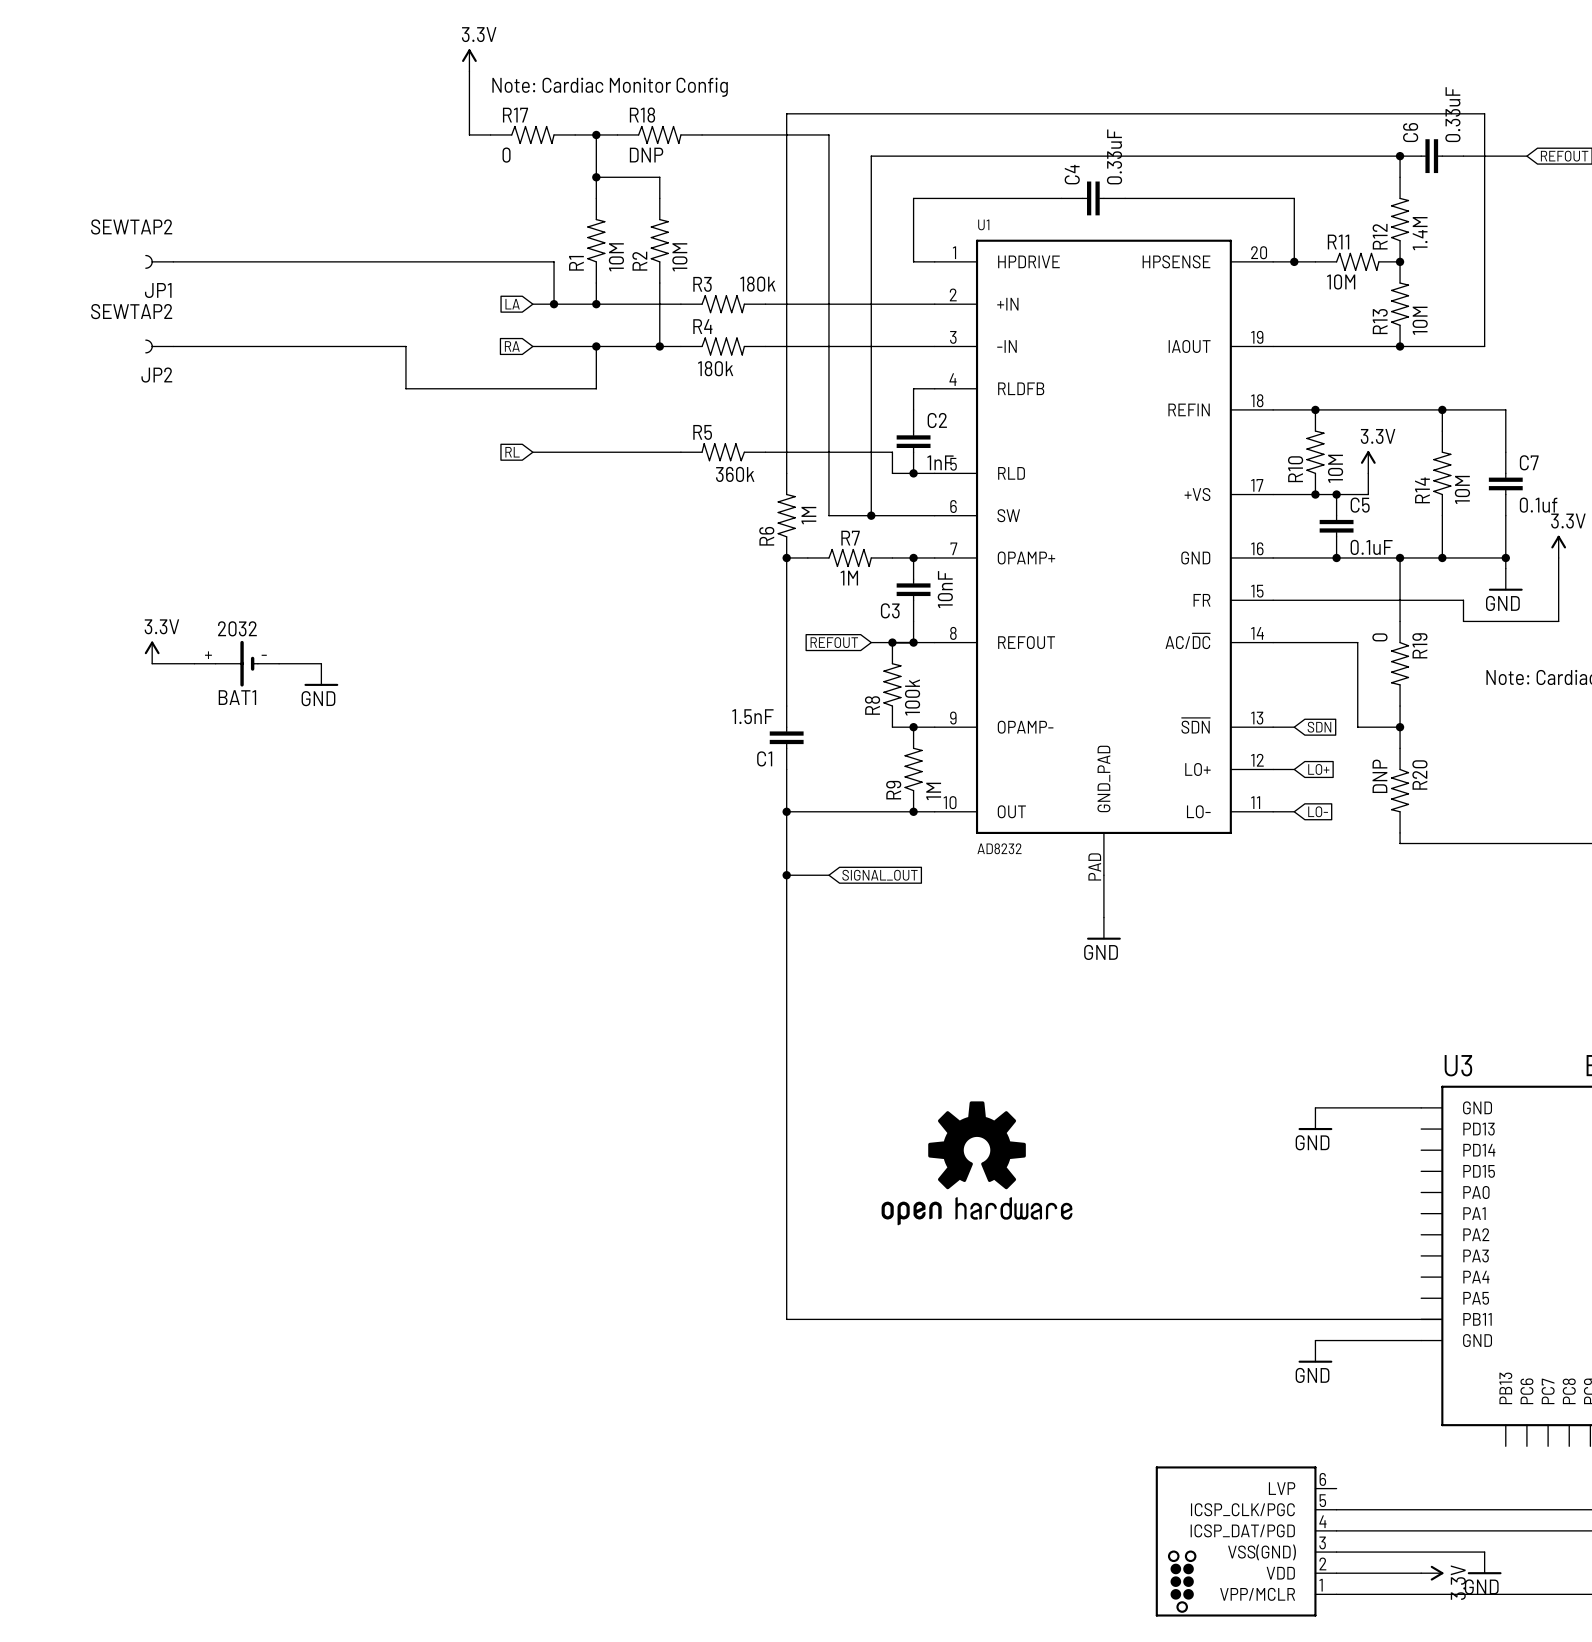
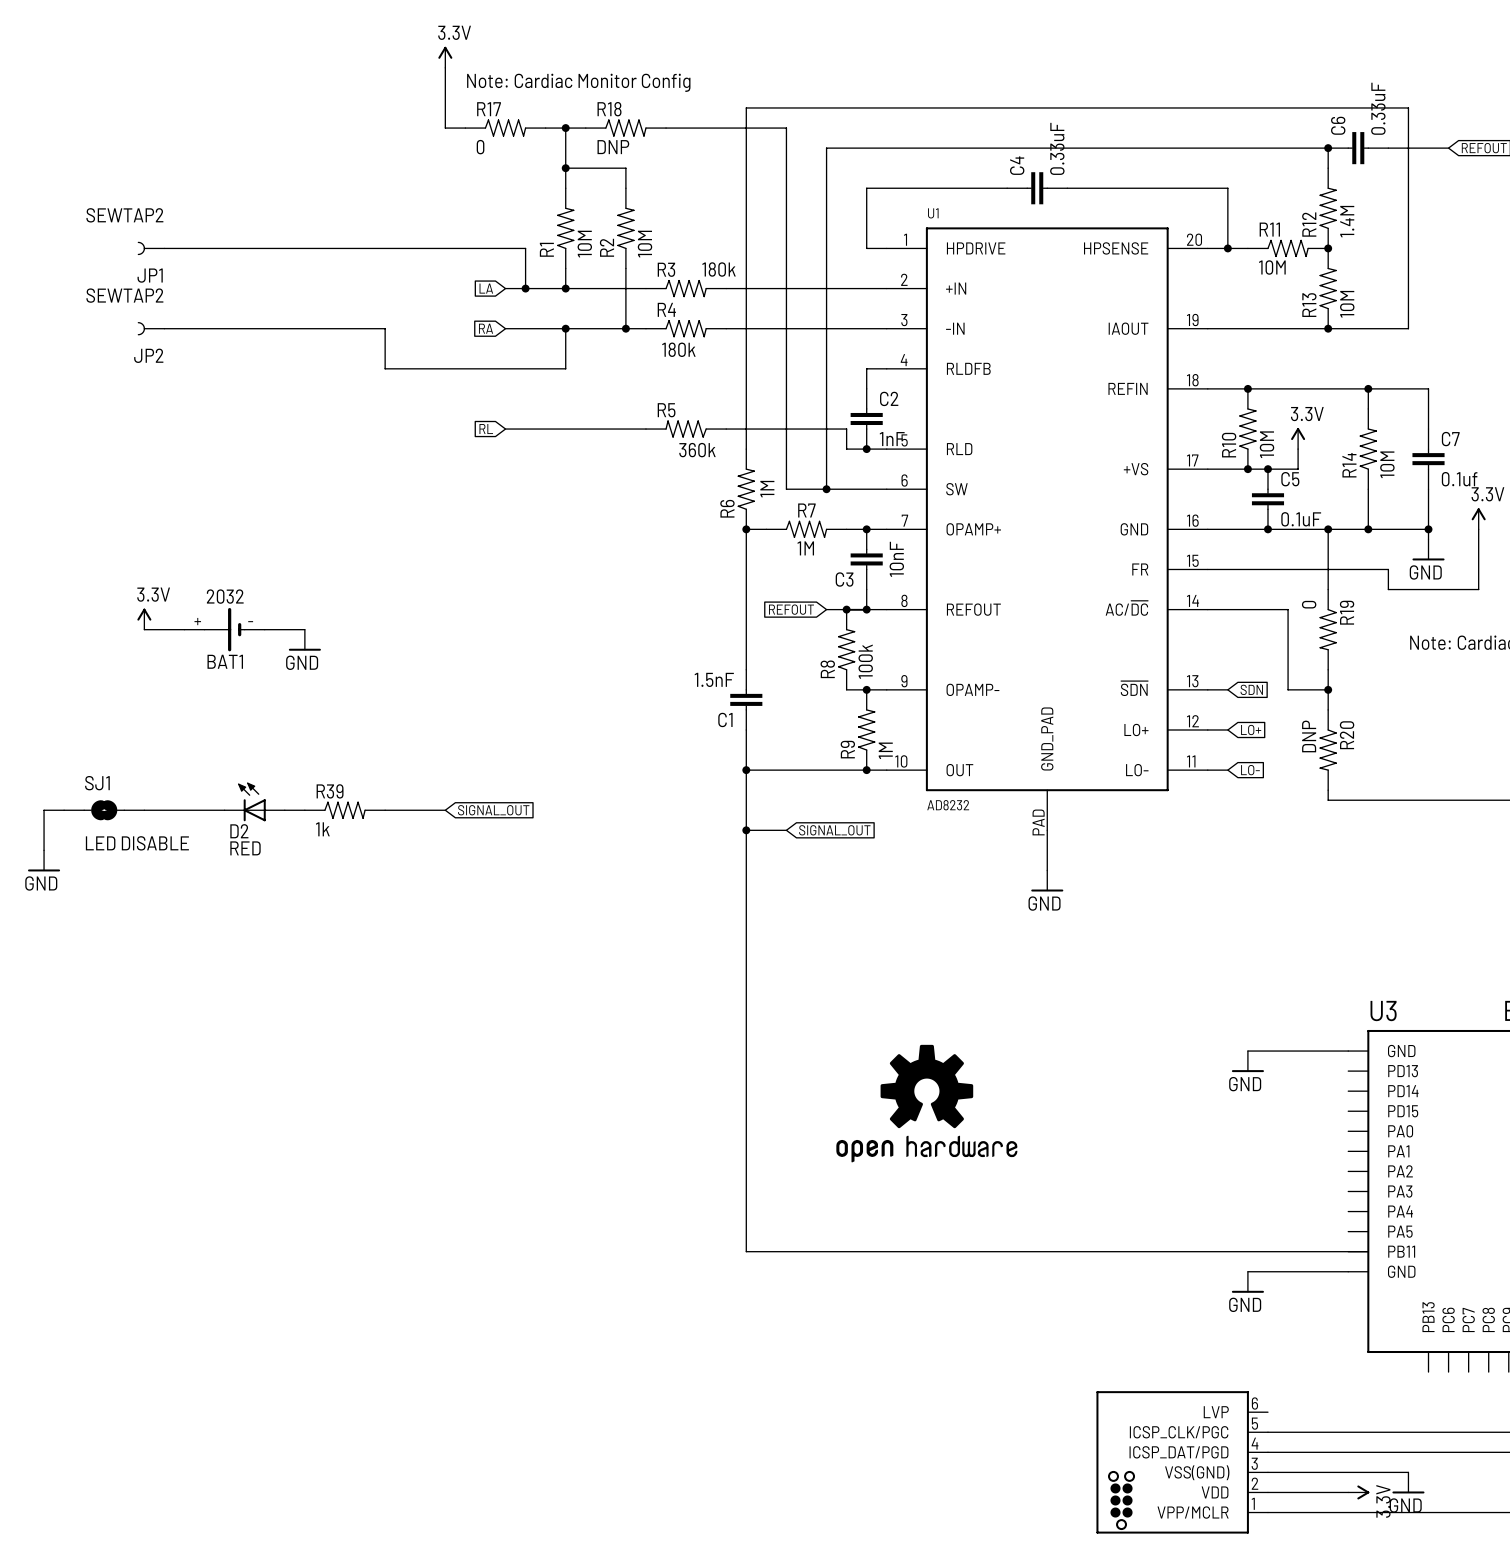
D2: none -> RED (254, 801)
wire: none -> (64, 810) (44, 810) (44, 850)
SJ1: none -> LED DISABLE (104, 810)
wire: none -> (144, 810) (224, 810)
wire: none -> (284, 810) (304, 810)
R39: none -> 1k (345, 810)
wire: none -> (385, 810) (445, 810)
global label: none -> SIGNAL_OUT (493, 810)
power symbol: none -> GND (44, 860)

